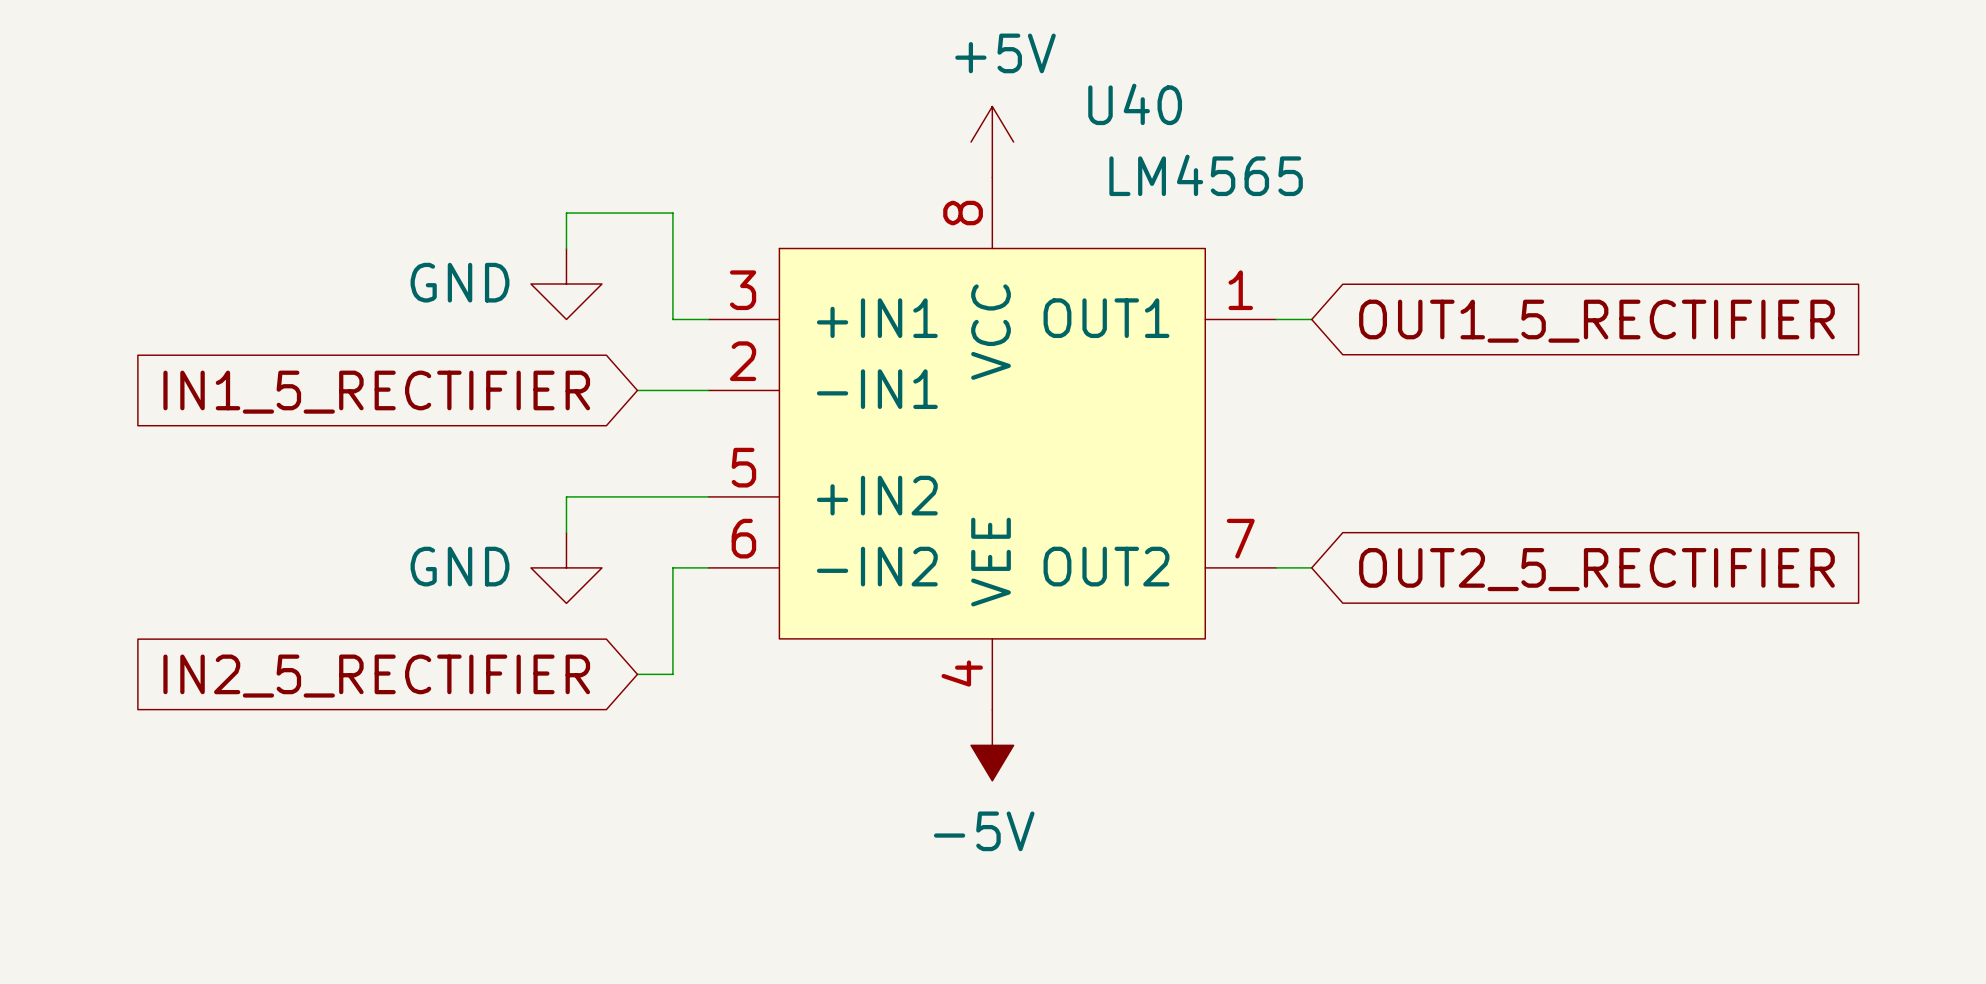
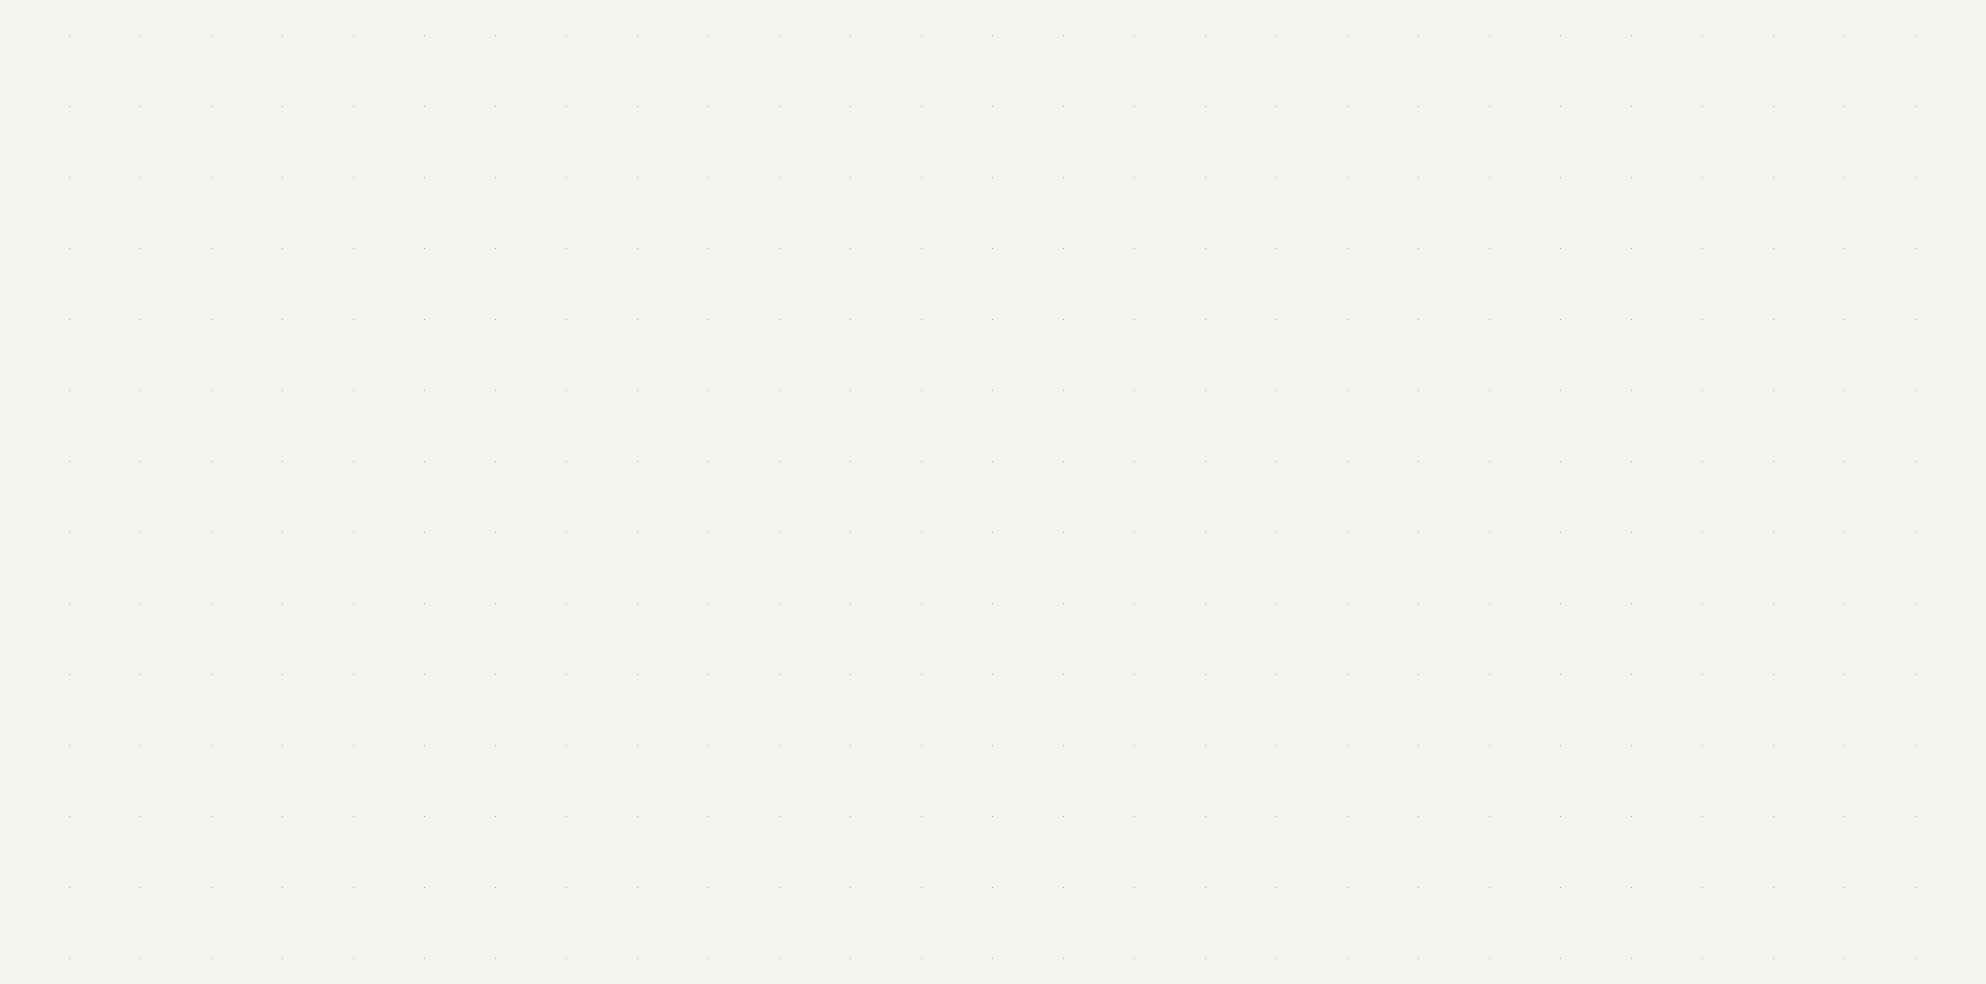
power symbol: +5V (992, 142) -> none
wire: (566, 248) (566, 213) (672, 213) (672, 319) (708, 319) -> none
power symbol: GND (566, 284) -> none
wire: (1276, 319) (1311, 319) -> none
global label: OUT1_5_RECTIFIER (1596, 321) -> none
wire: (637, 390) (708, 390) -> none
global label: IN1_5_RECTIFIER (376, 392) -> none
U40: LM4565 (992, 443) -> none
wire: (708, 496) (566, 496) (566, 532) -> none
power symbol: GND (566, 567) -> none
wire: (708, 567) (672, 567) (672, 674) (637, 674) -> none
wire: (1276, 567) (1311, 567) -> none
global label: OUT2_5_RECTIFIER (1596, 569) -> none
global label: IN2_5_RECTIFIER (376, 676) -> none
power symbol: -5V (992, 745) -> none

